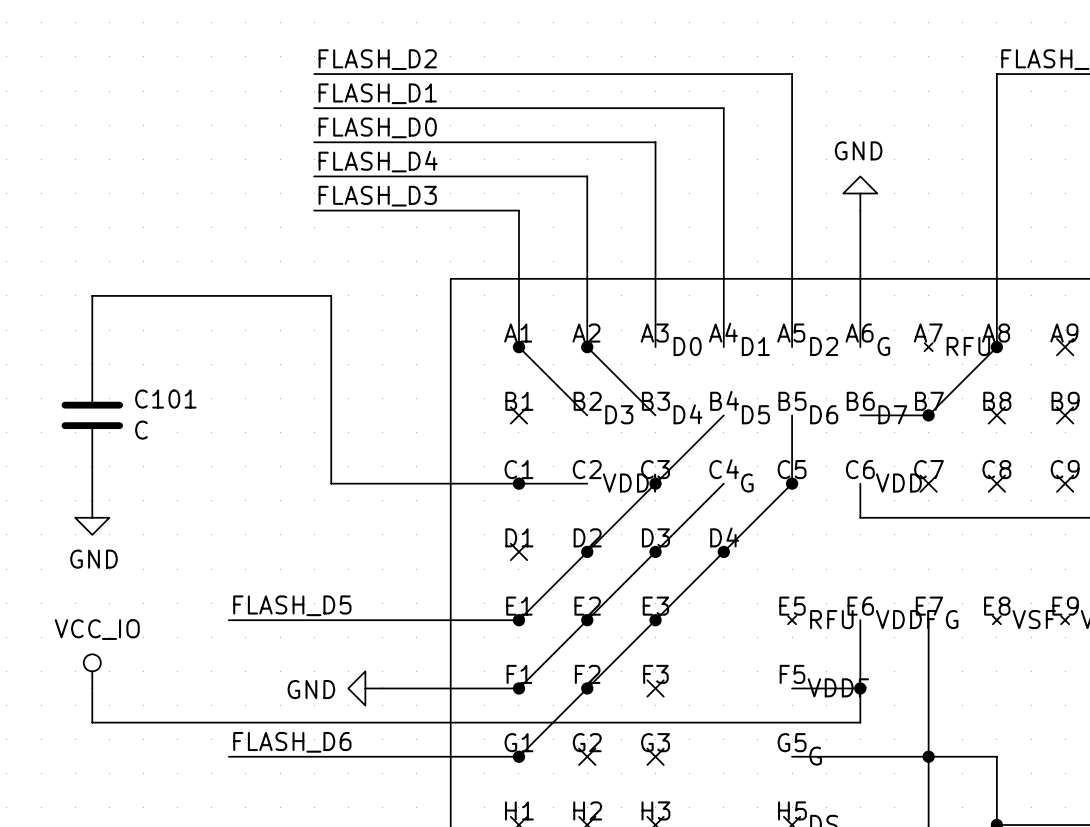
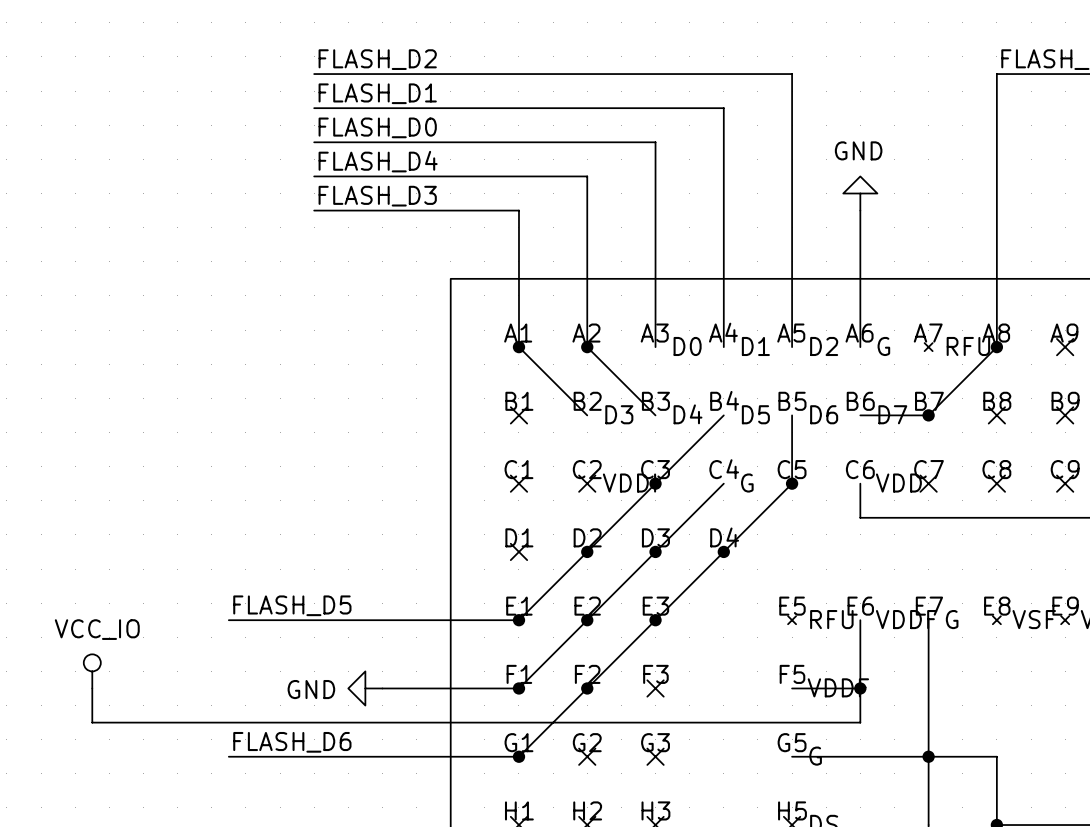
wire: (92, 364) (92, 295) (331, 295) (331, 483) (587, 483) -> none
C101: C (92, 415) -> none
wire: (92, 466) (92, 500) -> none
junction: (518, 483) -> none
no-connect mark: none -> (518, 483)
no-connect mark: none -> (587, 483)
power symbol: GND (92, 517) -> none

